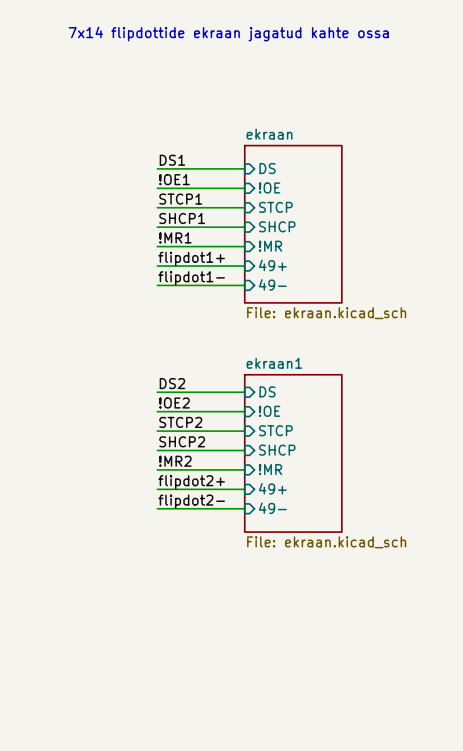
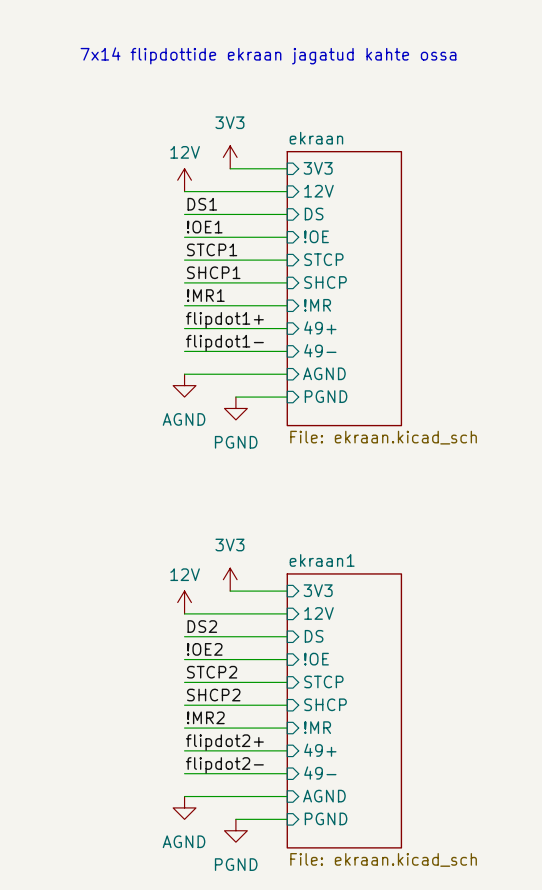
power symbol: none -> 3V3 (230, 157)
sheet pin: none -> 3V3 (318, 168)
wire: none -> (230, 168) (287, 168)
power symbol: none -> 12V (184, 180)
wire: none -> (184, 191) (287, 191)
sheet pin: none -> 12V (318, 191)
sheet ekraan: File: ekraan.kicad_sch (293, 224) -> none
sheet ekraan: none -> File: ekraan.kicad_sch (344, 288)
wire: none -> (184, 374) (287, 374)
sheet pin: none -> AGND (324, 373)
power symbol: none -> AGND (184, 385)
sheet pin: none -> PGND (326, 396)
wire: none -> (235, 397) (287, 397)
power symbol: none -> PGND (235, 408)
sheet ekraan1 name position: ekraan1 (274, 363) -> ekraan1 (322, 560)
sheet ekraan1 shape: [244, 374, 343, 533] -> [286, 573, 403, 849]
label position: DS2 (172, 383) -> DS2 (202, 626)
sheet pin position: DS (267, 391) -> DS (314, 636)
wire: (157, 392) (244, 392) -> (184, 636) (287, 636)
label position: !OE2 (174, 403) -> !OE2 (204, 649)
wire: (157, 411) (244, 411) -> (184, 659) (287, 659)
sheet pin position: !OE (269, 411) -> !OE (316, 659)
label position: STCP2 (180, 422) -> STCP2 (212, 672)
sheet pin position: STCP (275, 430) -> STCP (323, 681)
wire: (157, 431) (244, 431) -> (184, 682) (287, 682)
label position: SHCP2 (182, 441) -> SHCP2 (213, 695)
wire: (157, 450) (244, 450) -> (184, 705) (287, 705)
sheet pin position: SHCP (277, 450) -> SHCP (325, 704)
label position: !MR2 (175, 461) -> !MR2 (205, 717)
wire: (157, 469) (244, 469) -> (184, 728) (287, 728)
sheet pin position: !MR (270, 469) -> !MR (317, 727)
power symbol: none -> 3V3 (230, 579)
label position: flipdot2+ (191, 482) -> flipdot2+ (224, 742)
sheet pin: 49+ (272, 488) -> 3V3 (318, 590)
wire: (157, 489) (196, 489) -> none
power symbol: none -> 12V (184, 602)
label position: flipdot2- (191, 501) -> flipdot2- (224, 765)
sheet pin: 49- (272, 508) -> 12V (318, 613)
sheet ekraan1 value position: File: ekraan.kicad_sch (326, 542) -> File: ekraan.kicad_sch (383, 859)
sheet pin: none -> 49+ (320, 750)
wire: none -> (184, 750) (287, 750)
wire: none -> (184, 773) (287, 773)
sheet pin: none -> 49- (320, 773)
sheet pin: none -> AGND (324, 796)
wire: none -> (184, 796) (287, 796)
power symbol: none -> AGND (184, 807)
wire: none -> (235, 819) (287, 819)
sheet pin: none -> PGND (326, 818)
power symbol: none -> PGND (235, 830)

